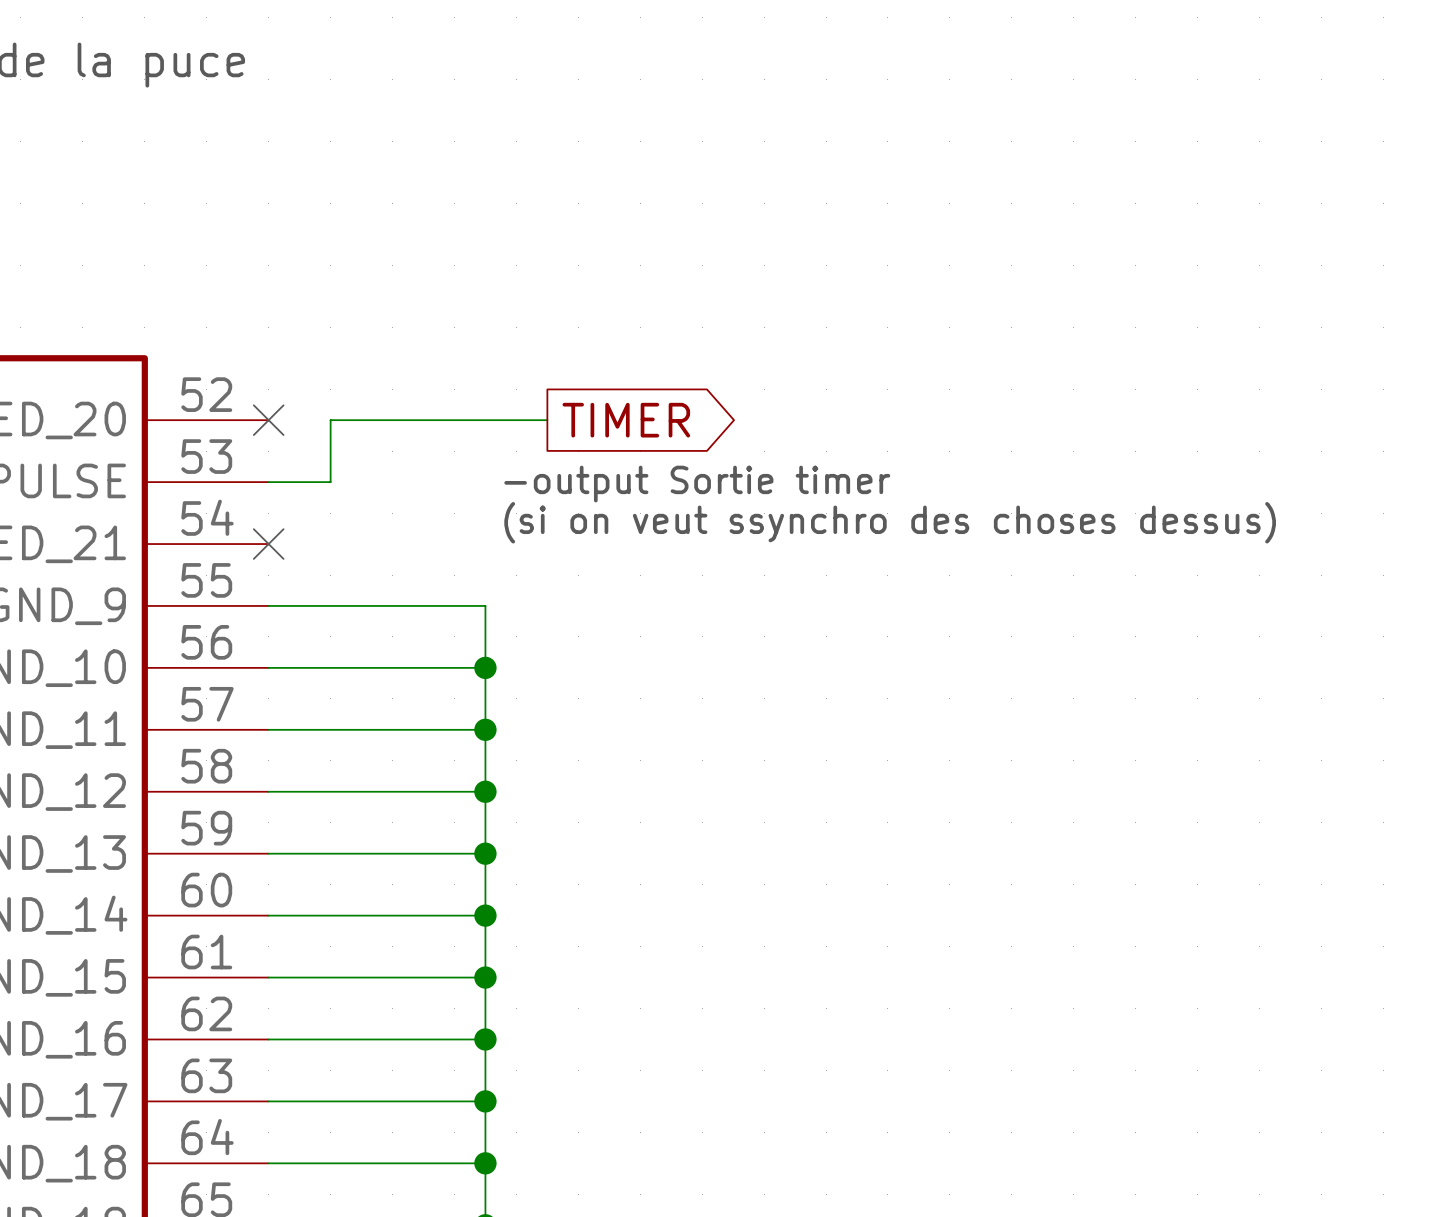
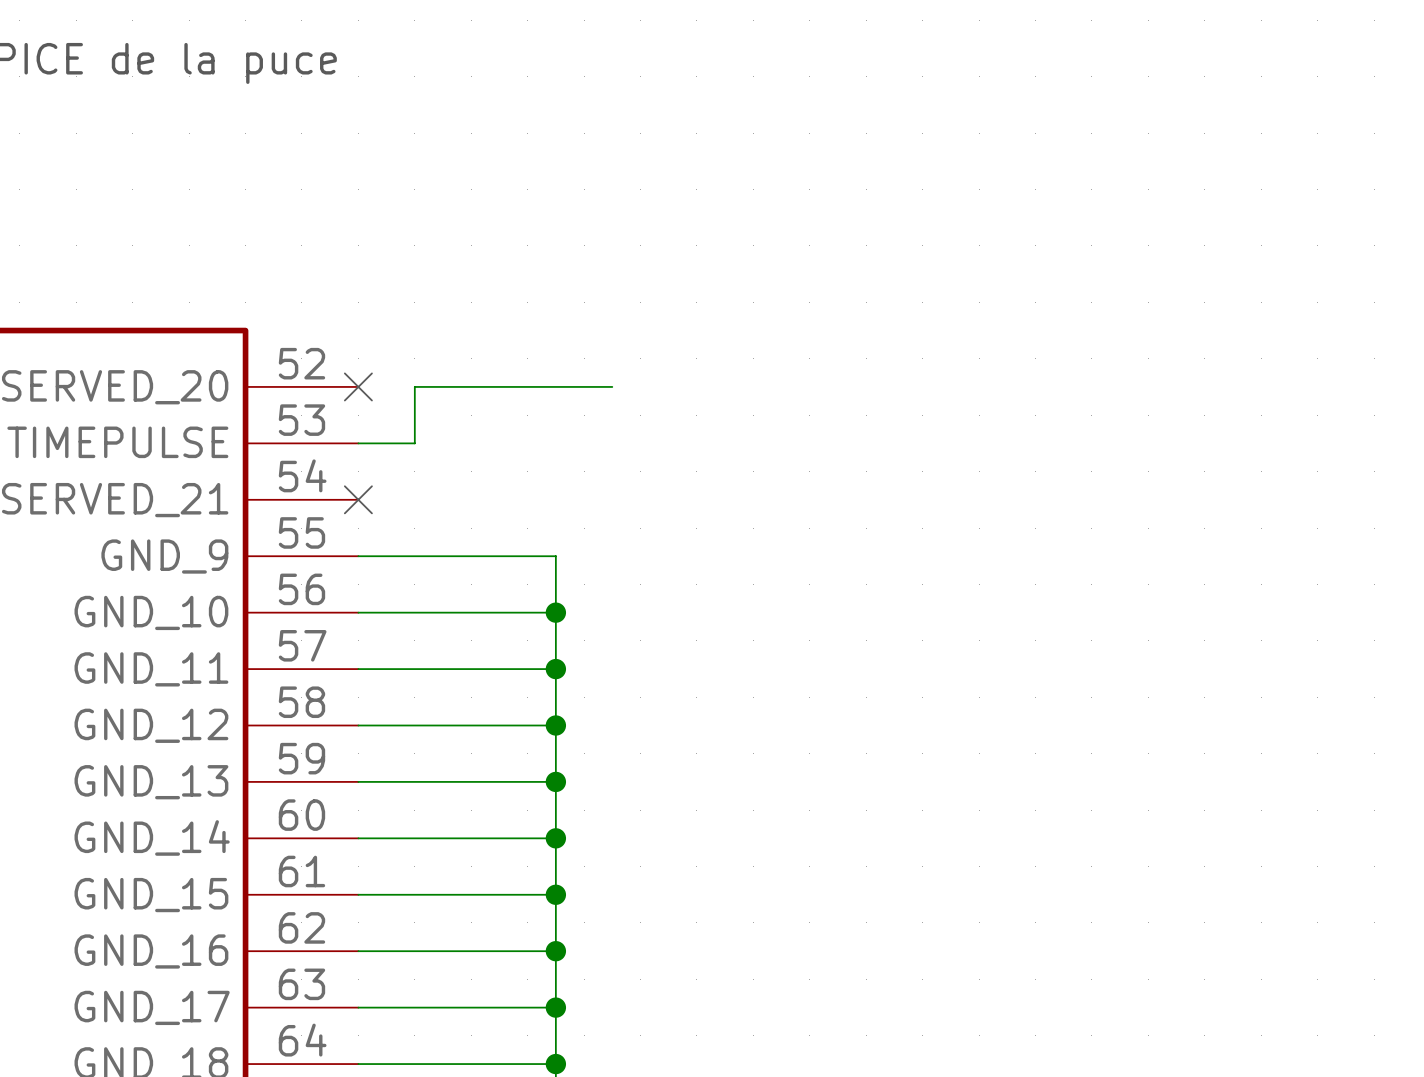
global label: TIMER (626, 420) -> none
text: -output Sortie timer (697, 484) -> none
text: (si on veut ssynchro des choses dessus) (890, 522) -> none

